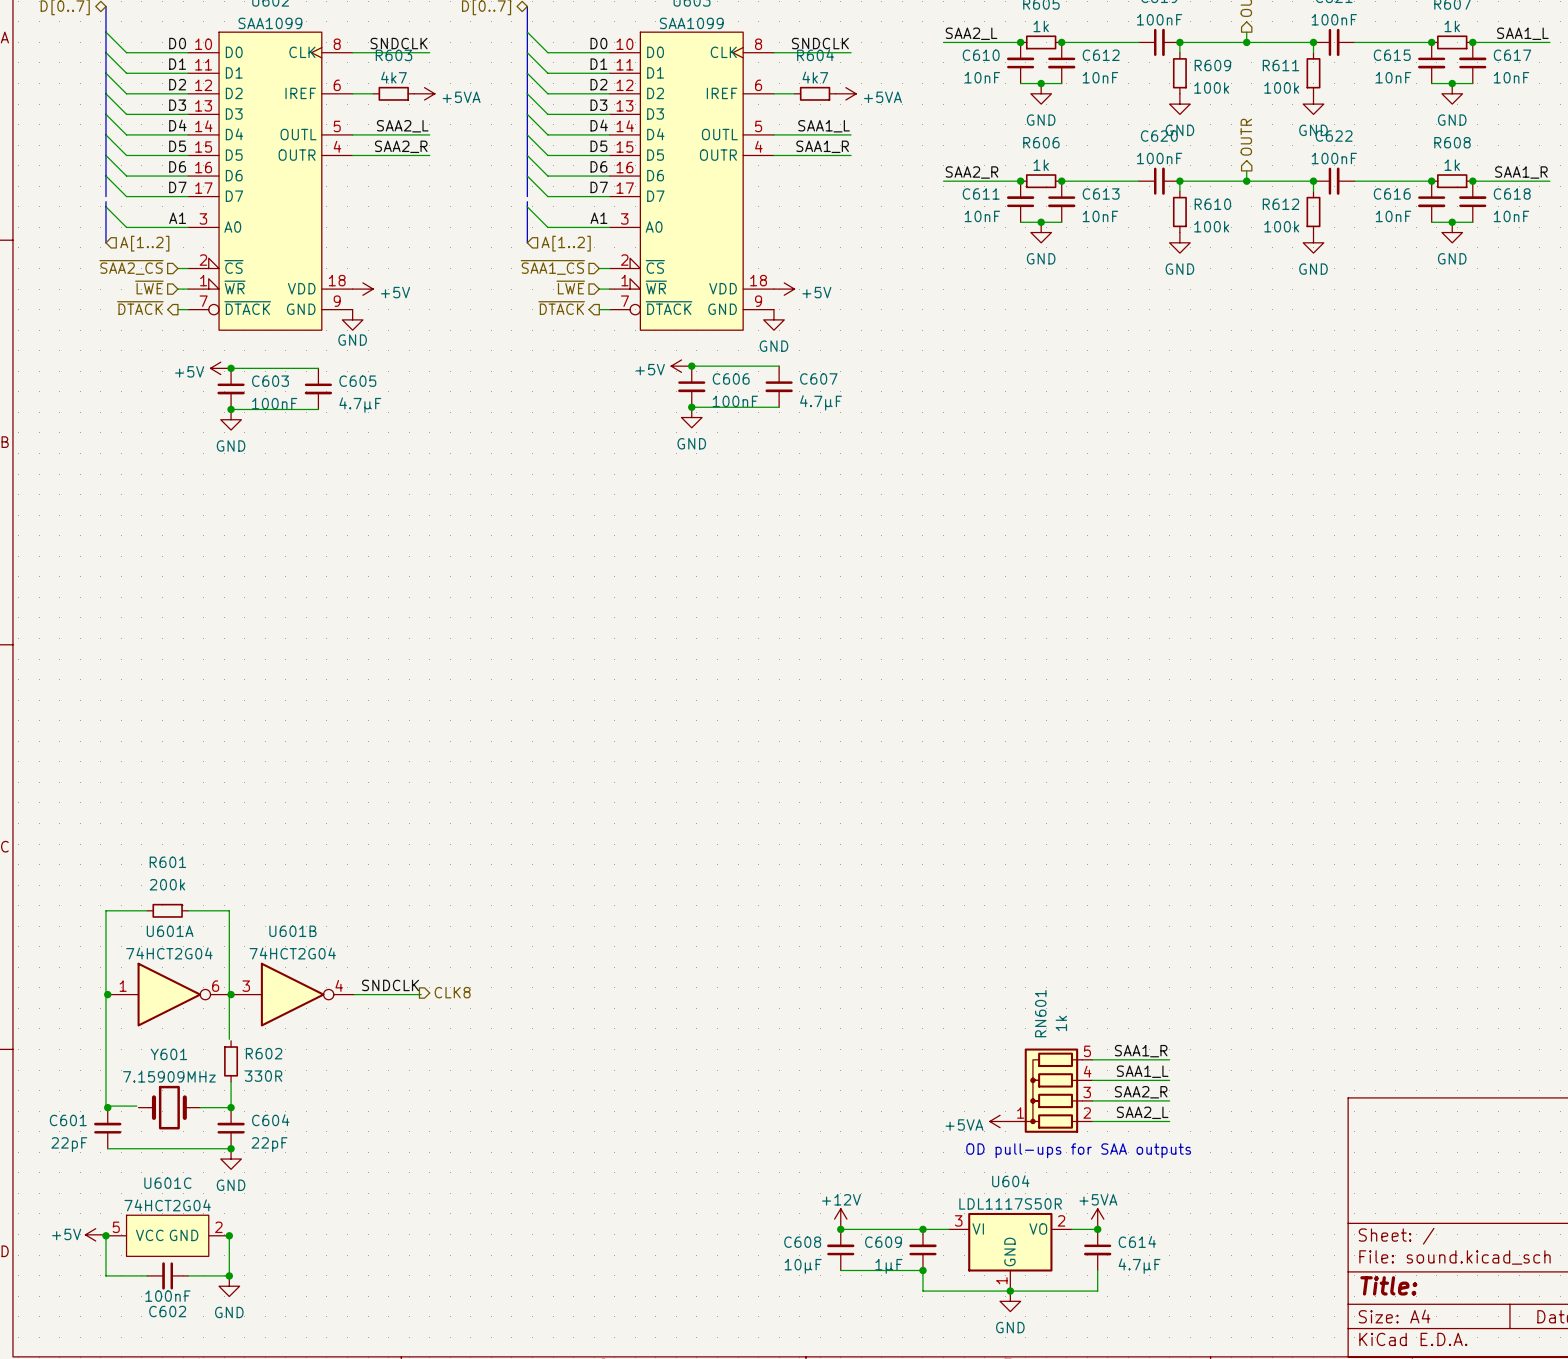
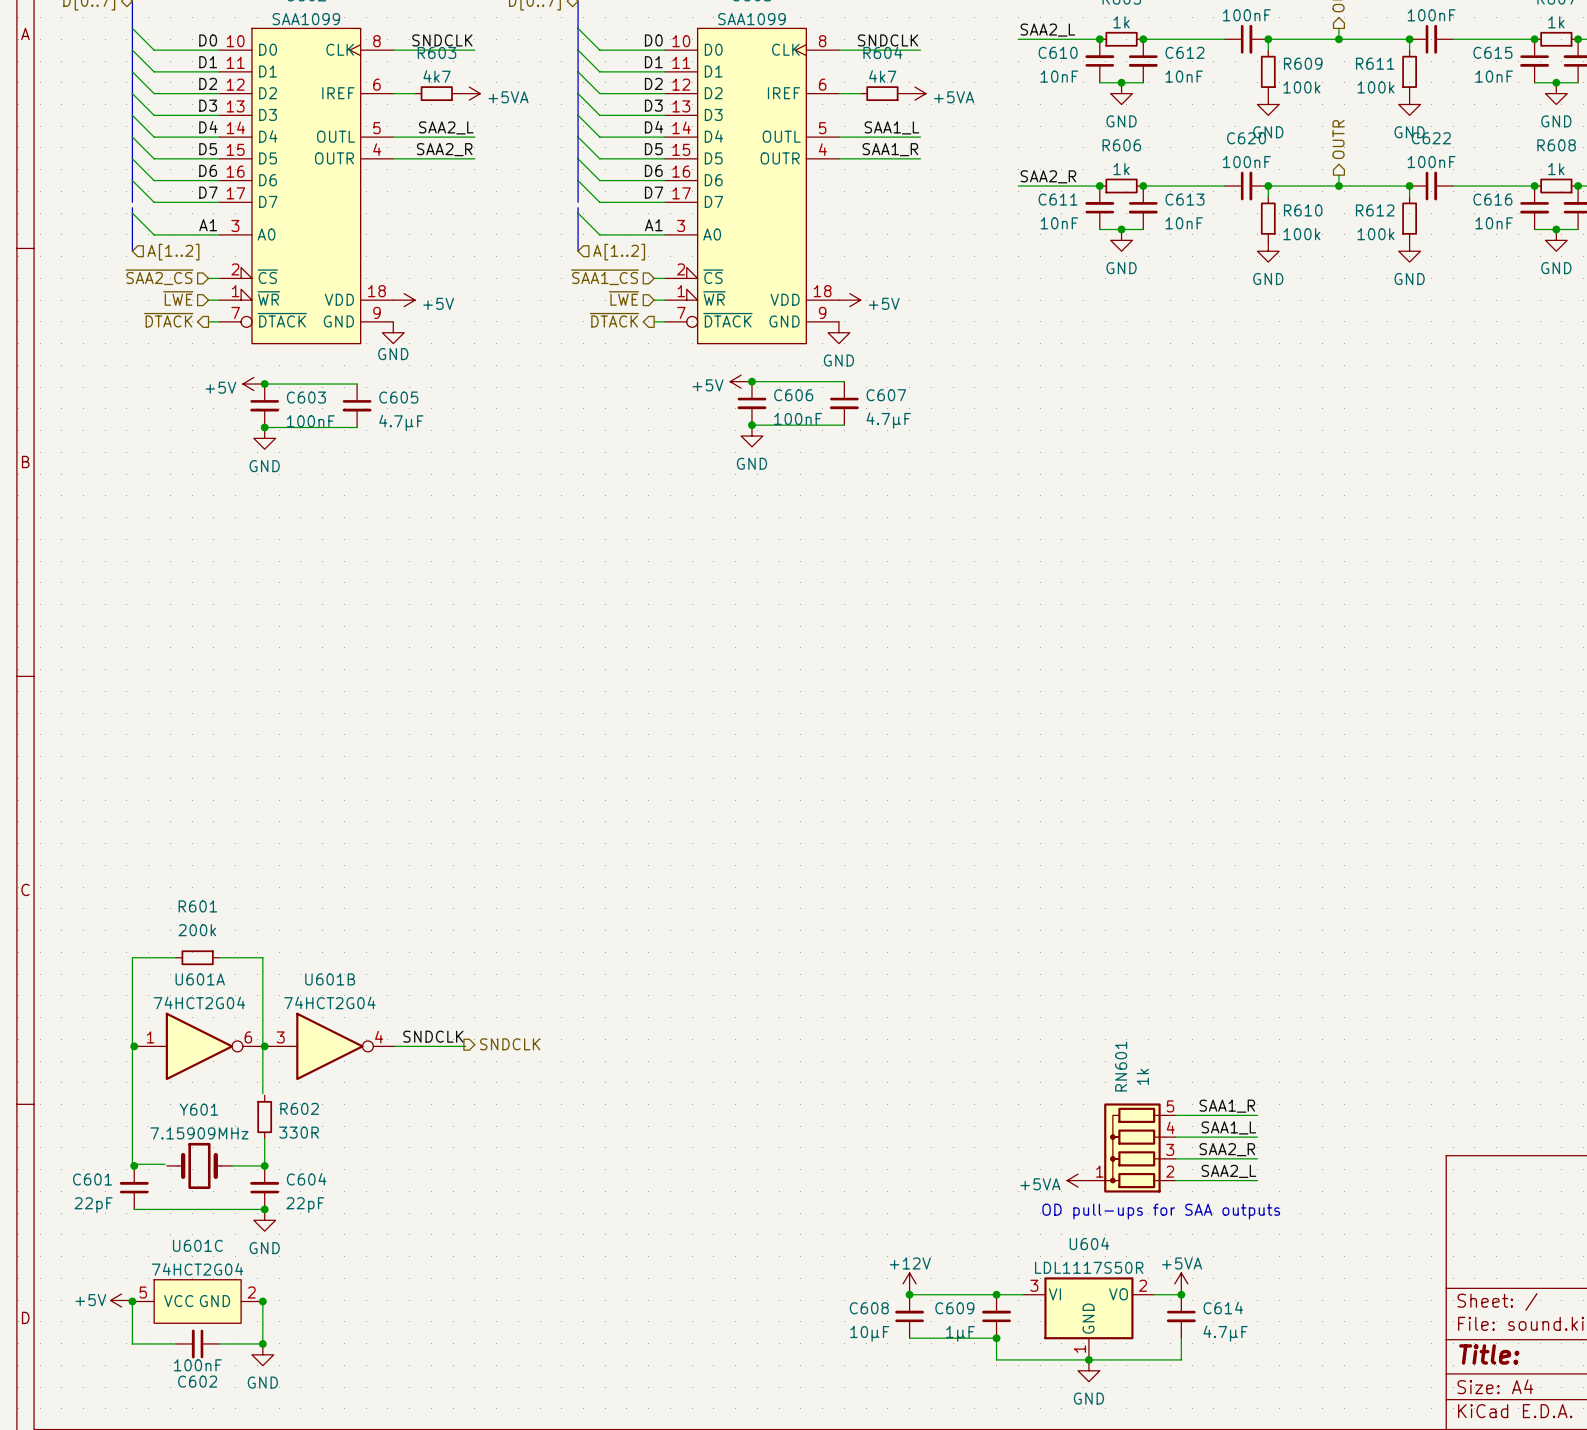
hierarchical label: CLK8 (452, 992) -> SNDCLK (510, 1044)

